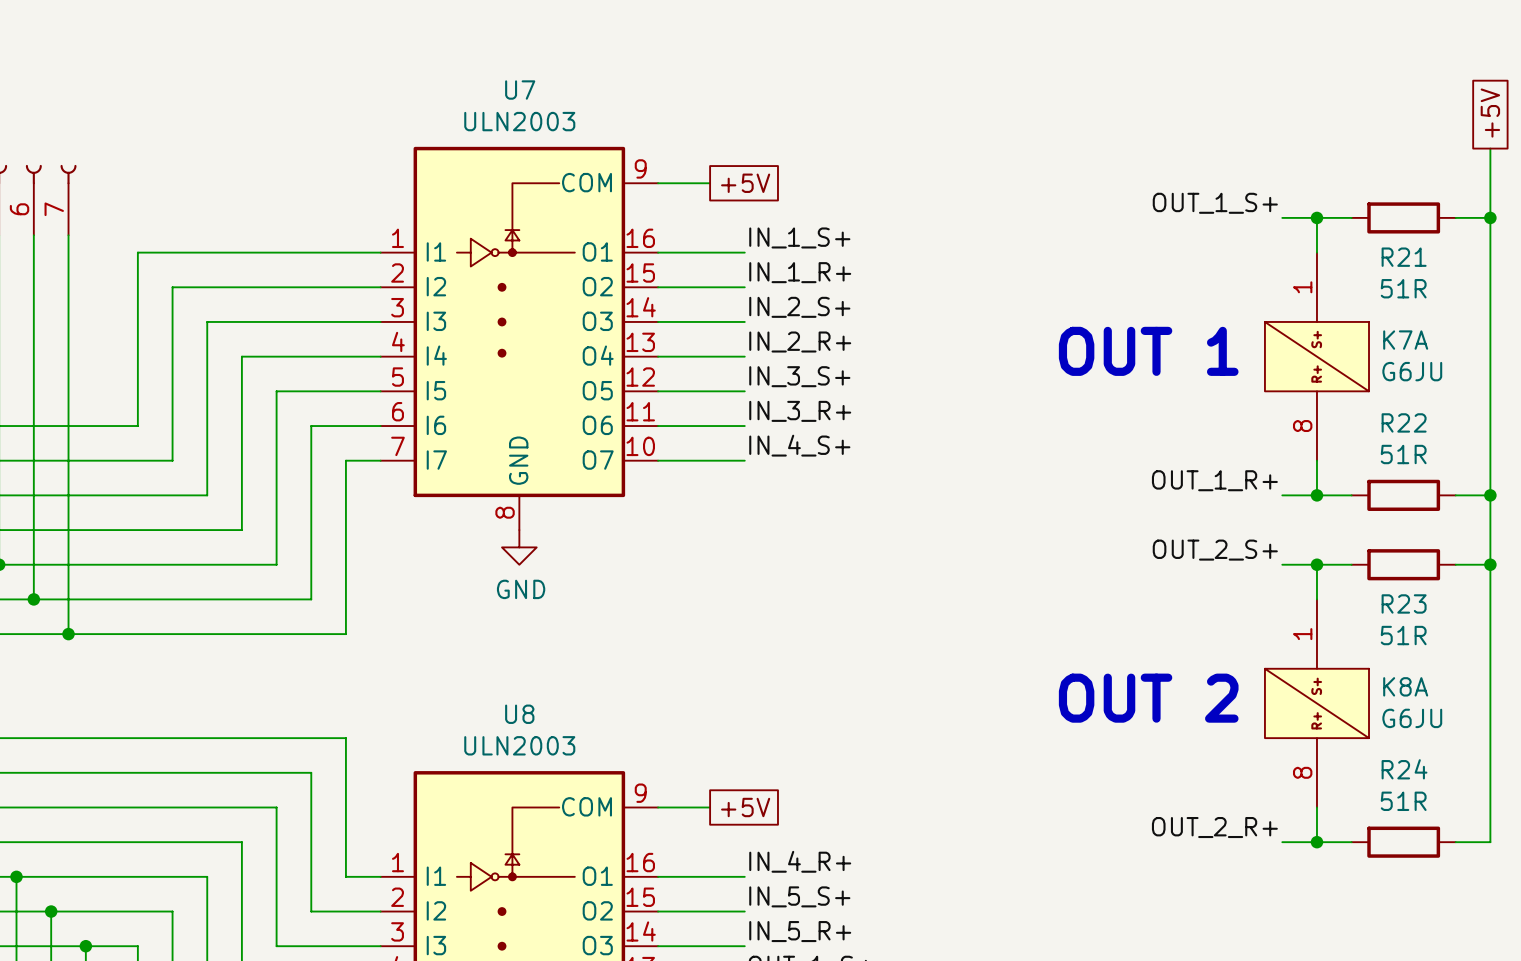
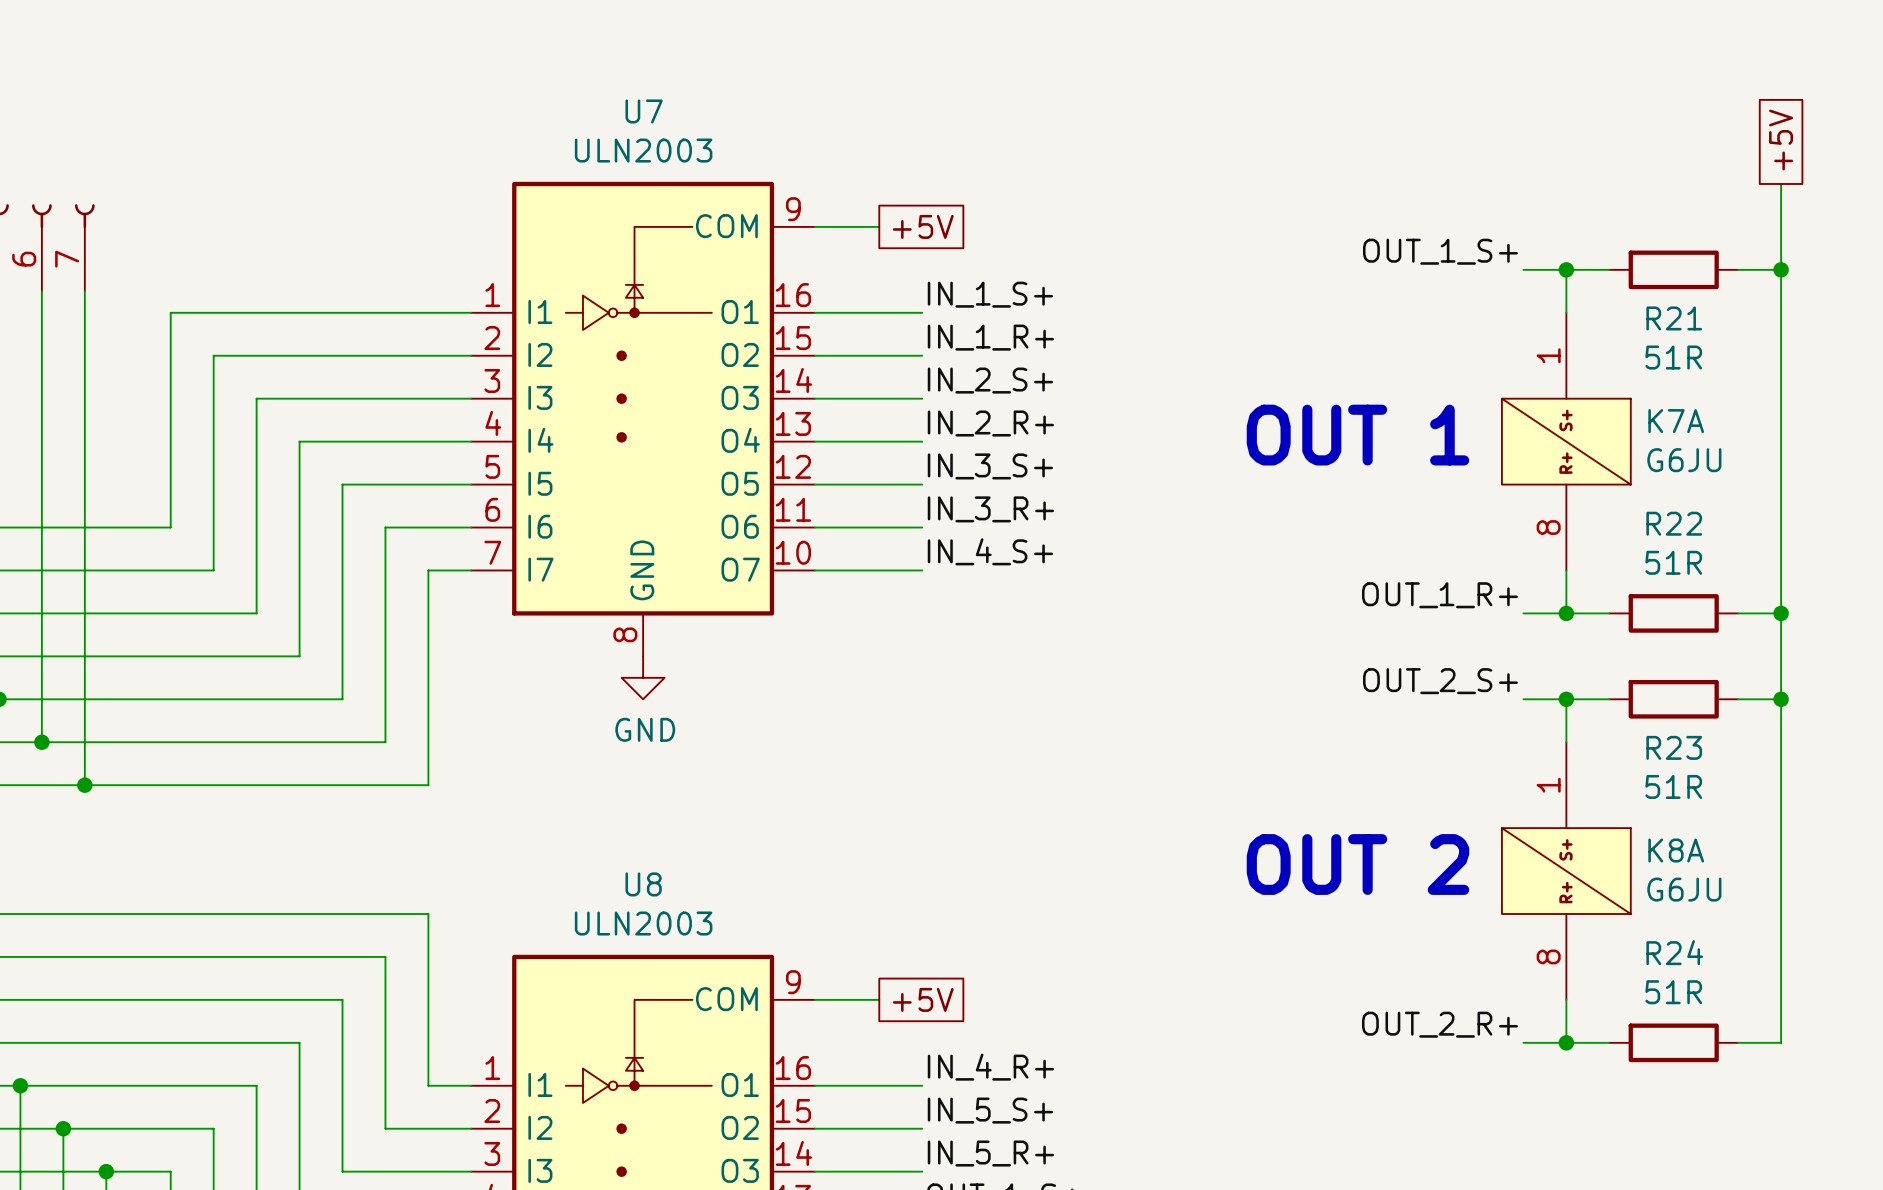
global label position: +5V (1490, 113) -> +5V (1781, 139)
wire: (1490, 148) (1490, 842) (1455, 842) -> (1781, 183) (1781, 1042) (1738, 1042)
label position: OUT_1_S+ (1215, 203) -> OUT_1_S+ (1440, 251)
wire: (1299, 217) (1351, 217) -> (1523, 269) (1587, 269)
wire: (1316, 217) (1316, 252) -> (1566, 269) (1566, 312)
junction position: (1316, 217) -> (1566, 269)
R21 position: (1403, 217) -> (1673, 269)
wire: (1455, 217) (1490, 217) -> (1738, 269) (1781, 269)
junction position: (1490, 217) -> (1781, 269)
text position: OUT 1 (1148, 351) -> OUT 1 (1357, 435)
K7A position: (1316, 356) -> (1566, 441)
wire: (1316, 460) (1316, 495) -> (1566, 570) (1566, 613)
label position: OUT_1_R+ (1214, 480) -> OUT_1_R+ (1439, 595)
junction: none -> (1566, 613)
wire: (1299, 495) (1351, 495) -> (1523, 613) (1587, 613)
junction: (1316, 495) -> none
R22 position: (1403, 495) -> (1673, 613)
junction: none -> (1781, 613)
wire: (1455, 495) (1490, 495) -> (1738, 613) (1781, 613)
junction: (1490, 495) -> none
label position: OUT_2_S+ (1215, 550) -> OUT_2_S+ (1440, 681)
junction: none -> (1566, 699)
wire: (1299, 564) (1351, 564) -> (1523, 699) (1587, 699)
wire: (1316, 564) (1316, 599) -> (1566, 699) (1566, 742)
junction: (1316, 564) -> none
R23 position: (1403, 564) -> (1673, 699)
junction: none -> (1781, 699)
wire: (1455, 564) (1490, 564) -> (1738, 699) (1781, 699)
junction: (1490, 564) -> none
text position: OUT 2 (1148, 698) -> OUT 2 (1357, 864)
K8A position: (1316, 703) -> (1566, 871)
wire: (1316, 807) (1316, 842) -> (1566, 999) (1566, 1042)
label position: OUT_2_R+ (1214, 827) -> OUT_2_R+ (1439, 1024)
wire: (1299, 842) (1351, 842) -> (1523, 1042) (1587, 1042)
junction position: (1316, 842) -> (1566, 1042)
R24 position: (1403, 842) -> (1673, 1042)

